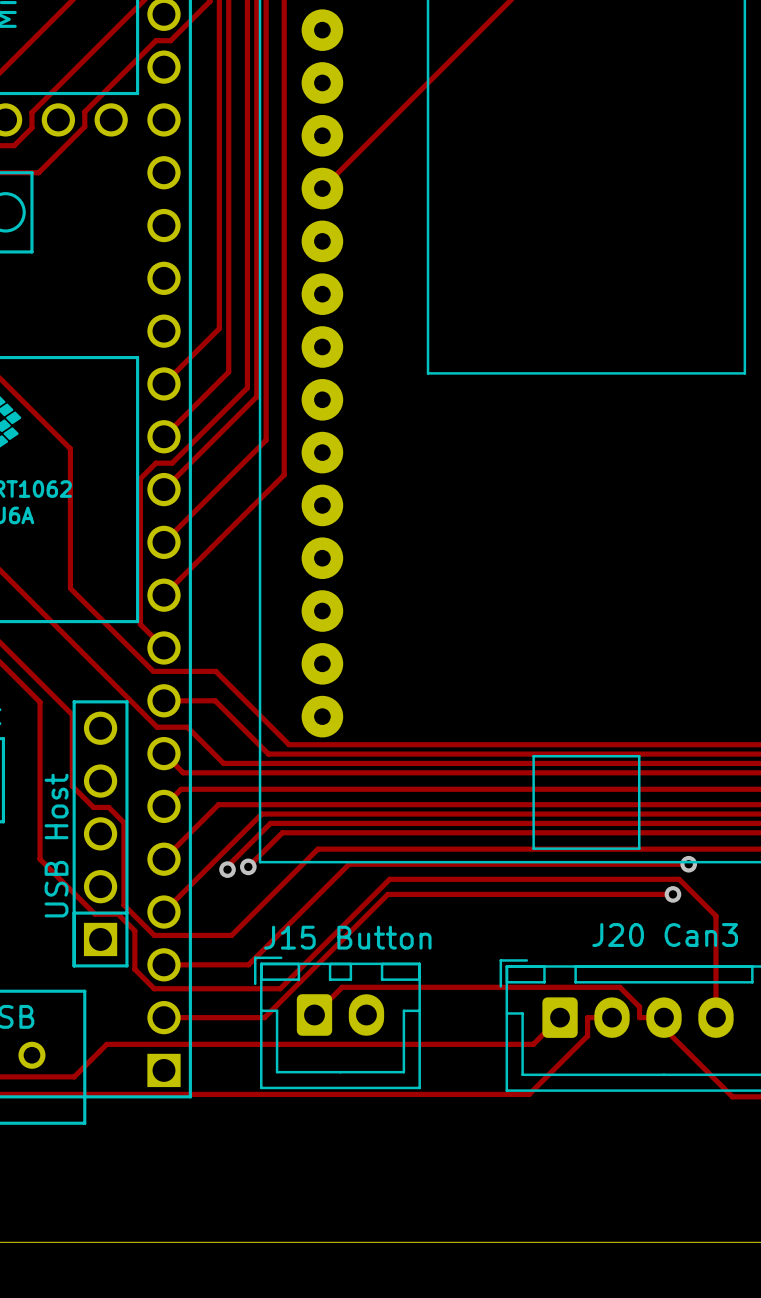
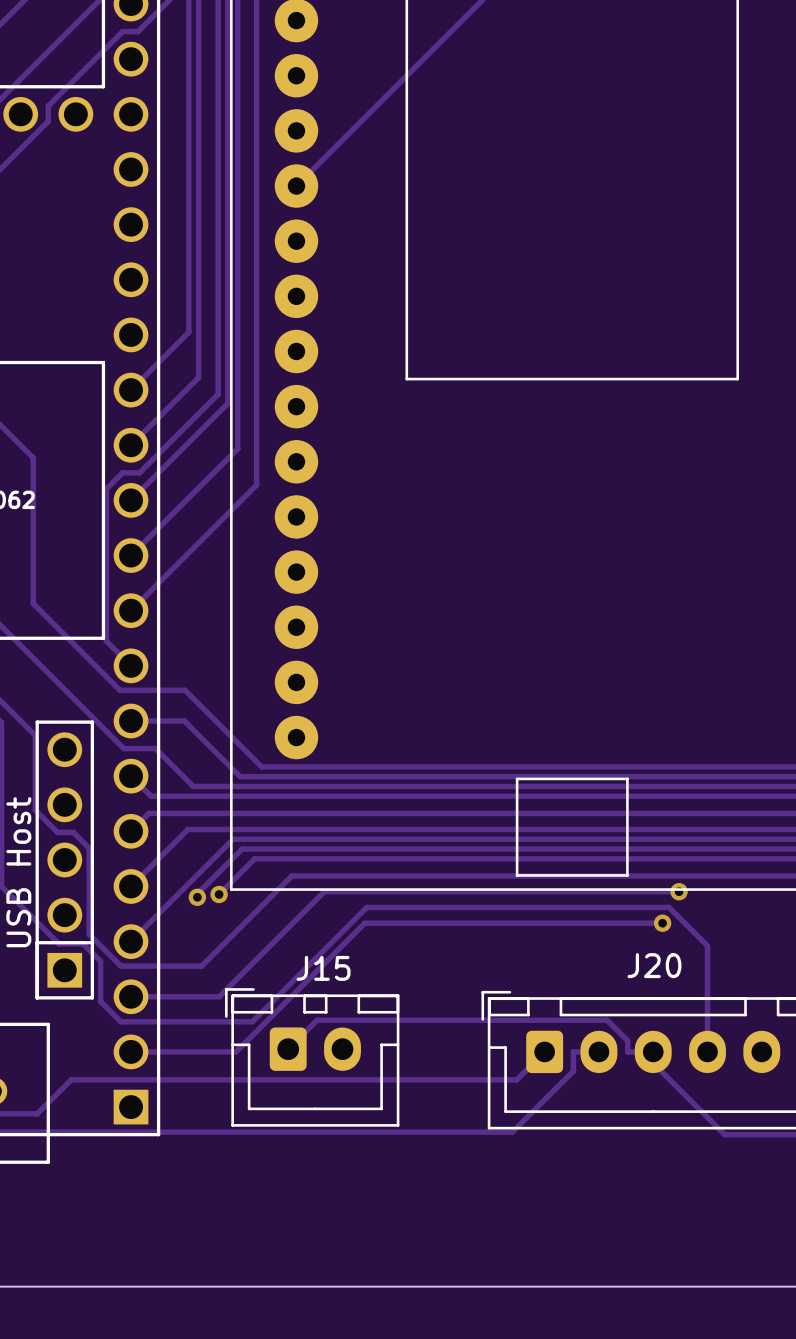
J20 Can3 name: J20 Can3 (665, 935) -> J20 (654, 965)
J15 Button name: J15 Button (347, 937) -> J15 (323, 968)

